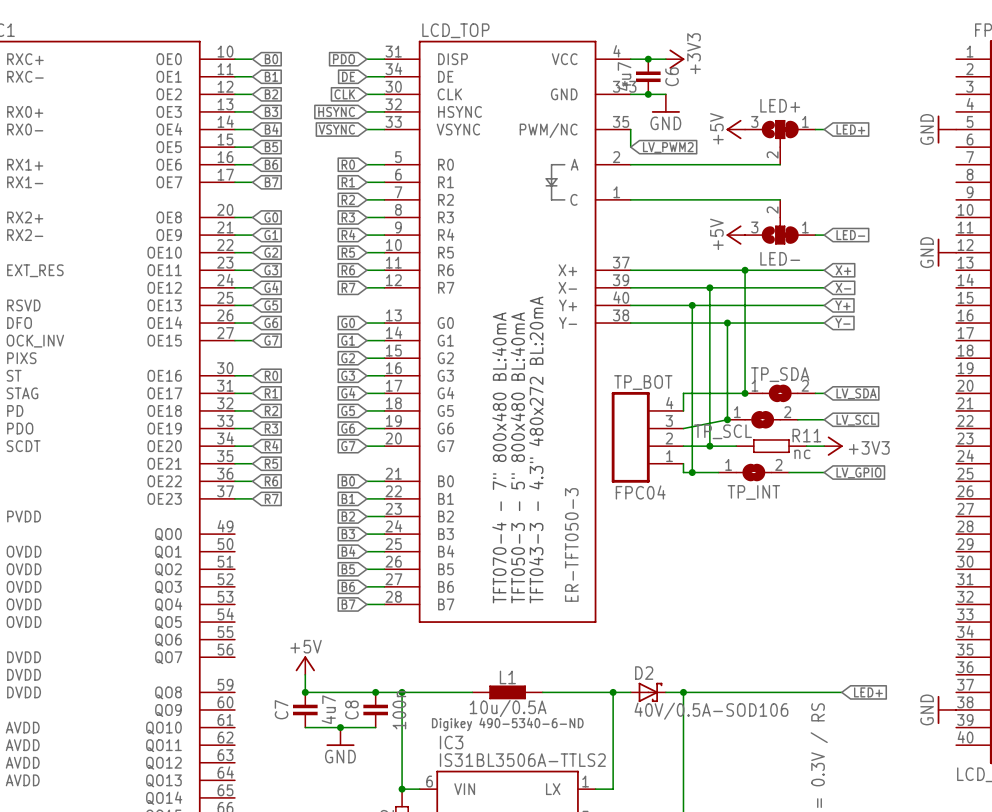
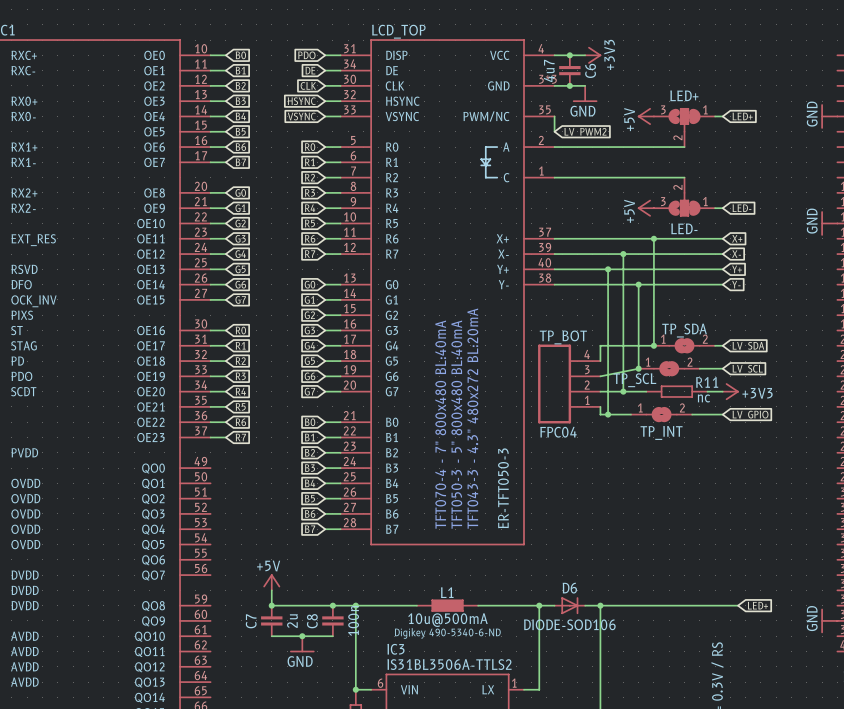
D2: 40V/0.5A-SOD106 (648, 692) -> none
D6: none -> DIODE-SOD106 (569, 605)
L1 value: 10u/0.5A (508, 708) -> 10u@500mA (447, 620)
C7 value: 4u7 (328, 709) -> 2u (292, 621)

